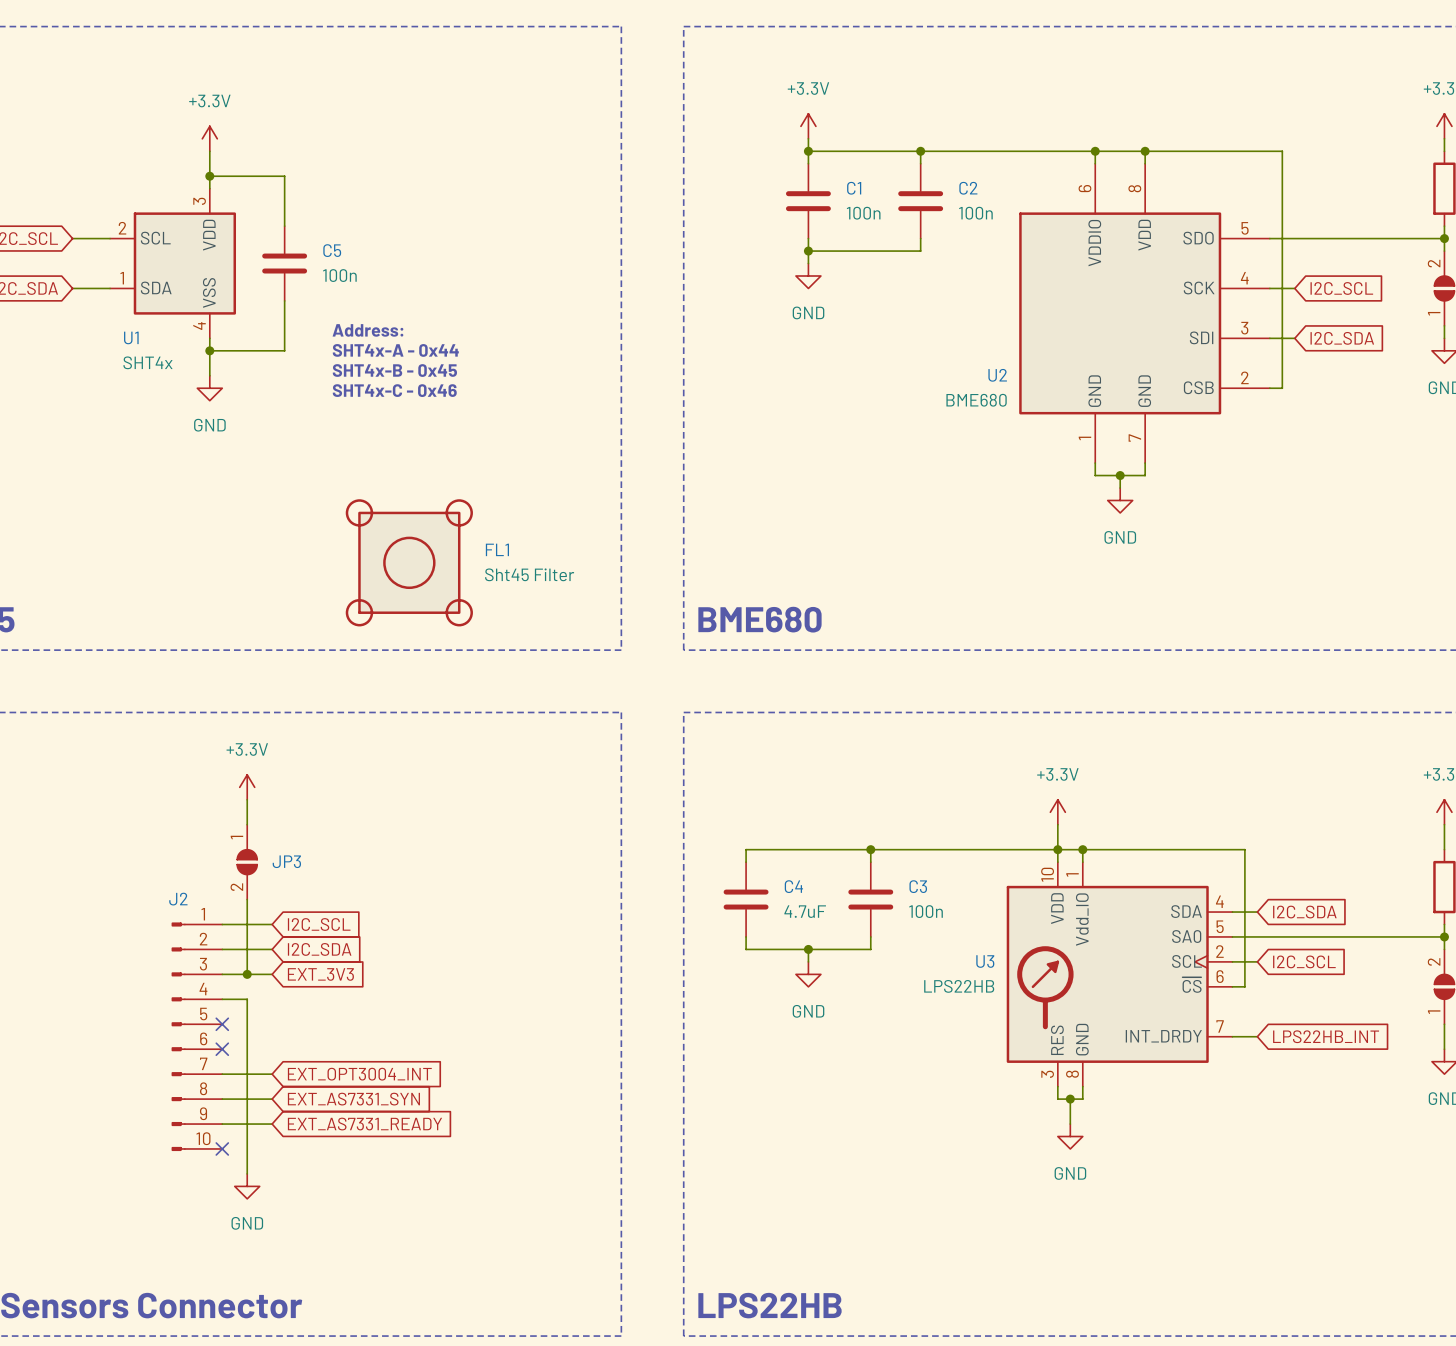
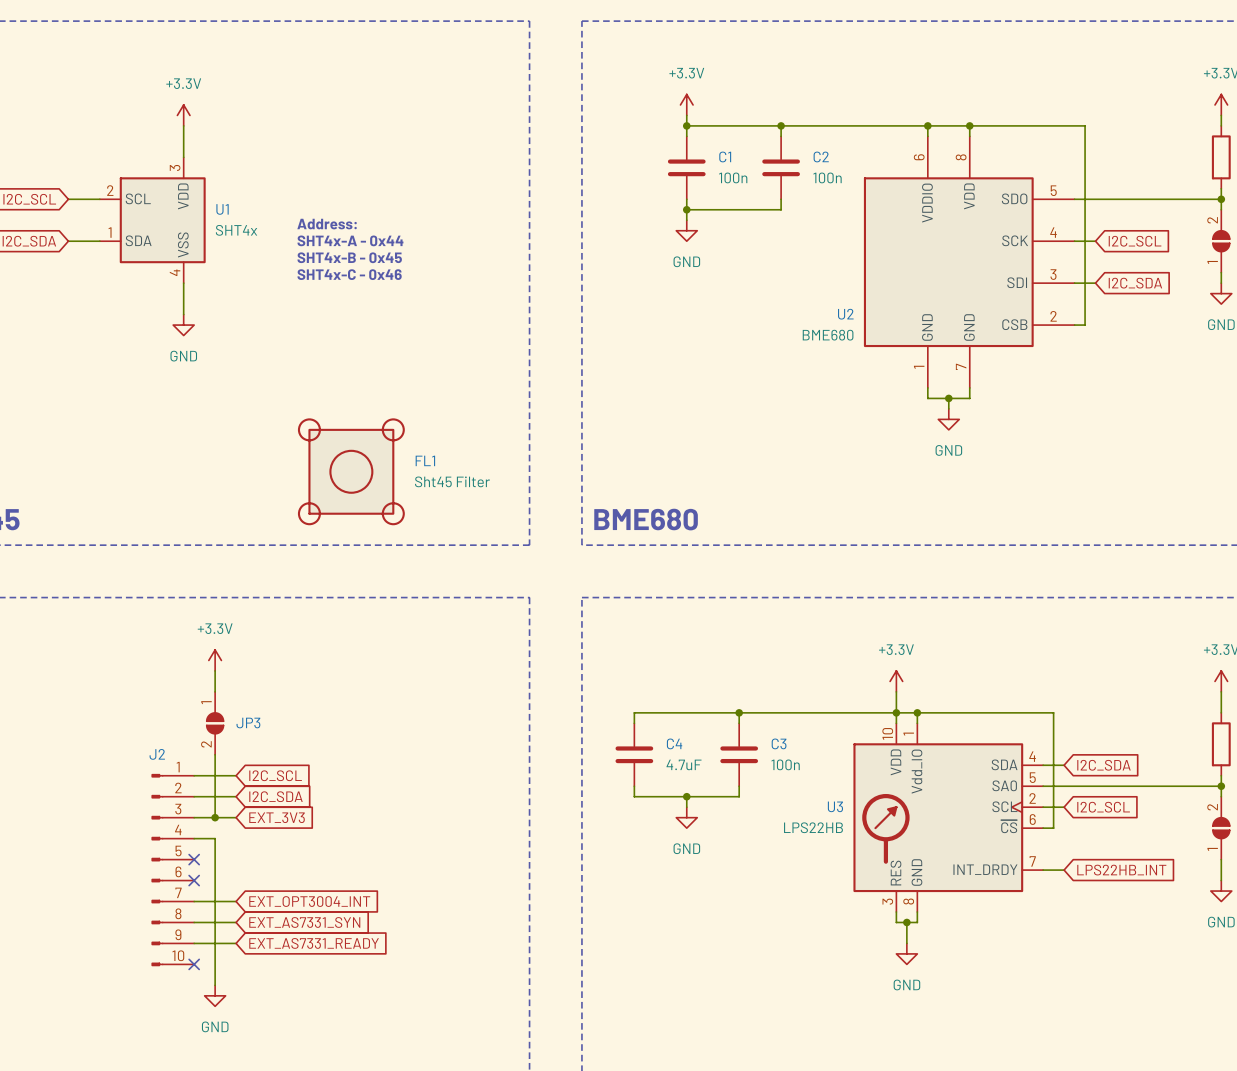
wire: (209, 176) (284, 176) (284, 226) -> none
junction: (209, 176) -> none
C5: 100n (284, 263) -> none
wire: (284, 300) (284, 350) (209, 350) -> none
text position: Address: (367, 330) -> Address: (327, 224)
U1 name position: U1 (131, 337) -> U1 (222, 209)
junction: (209, 350) -> none
text position: SHT4x-A - 0x44 (395, 350) -> SHT4x-A - 0x44 (350, 240)
U1 value position: SHT4x (148, 362) -> SHT4x (236, 230)
text position: SHT4x-B - 0x45 (394, 370) -> SHT4x-B - 0x45 (349, 257)
text position: SHT4x-C - 0x46 (394, 390) -> SHT4x-C - 0x46 (349, 274)

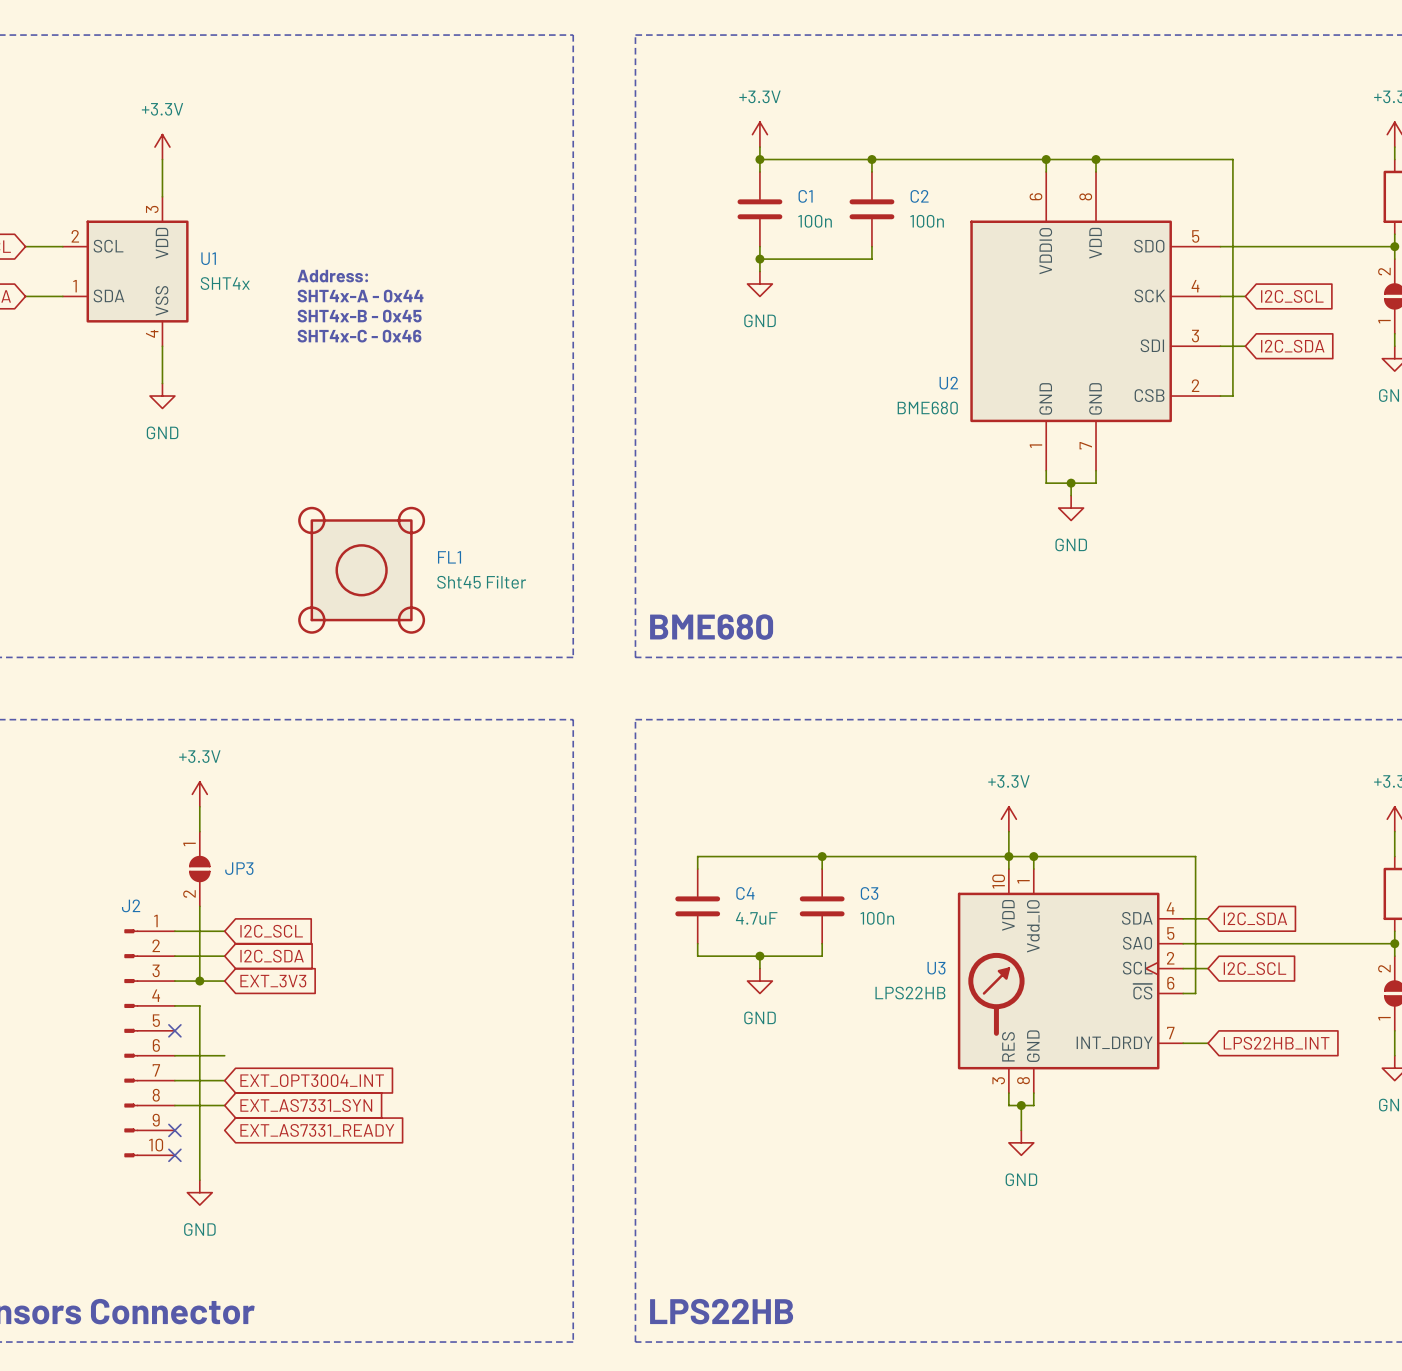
no-connect mark: (194, 880) -> none
wire: (194, 943) (236, 943) -> (174, 1055) (224, 1055)
no-connect mark: none -> (174, 1130)

